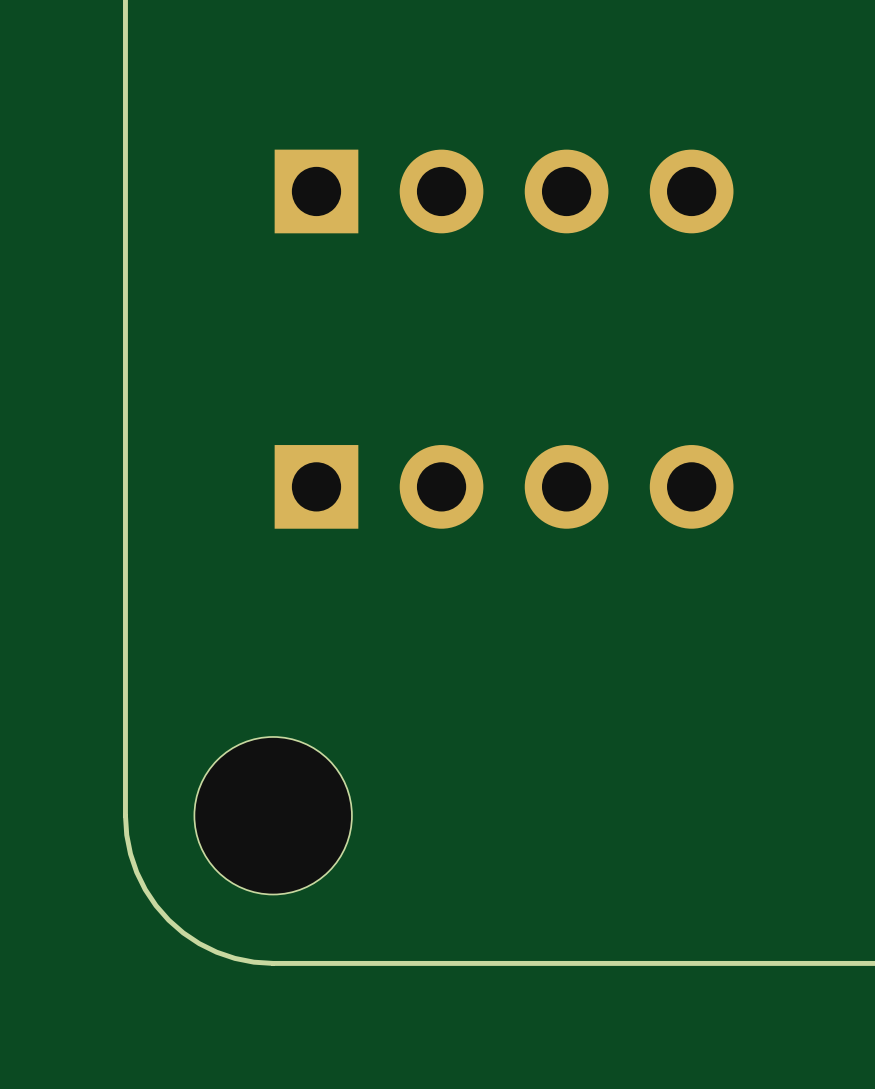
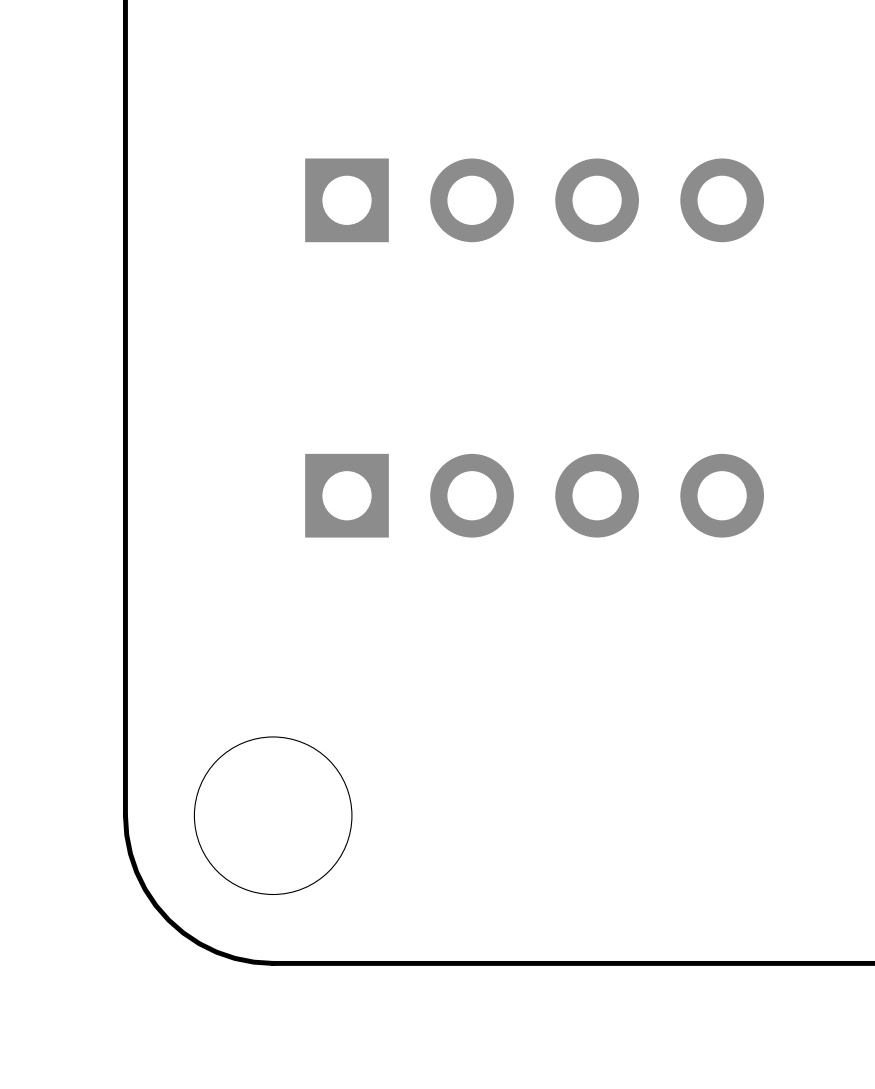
part position: (504, 191) -> (534, 200)
part position: (504, 486) -> (534, 495)

